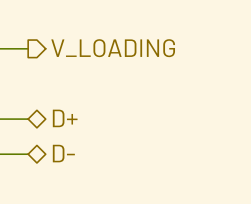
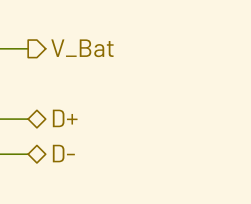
hierarchical label: V_LOADING (113, 48) -> V_Bat (82, 48)

